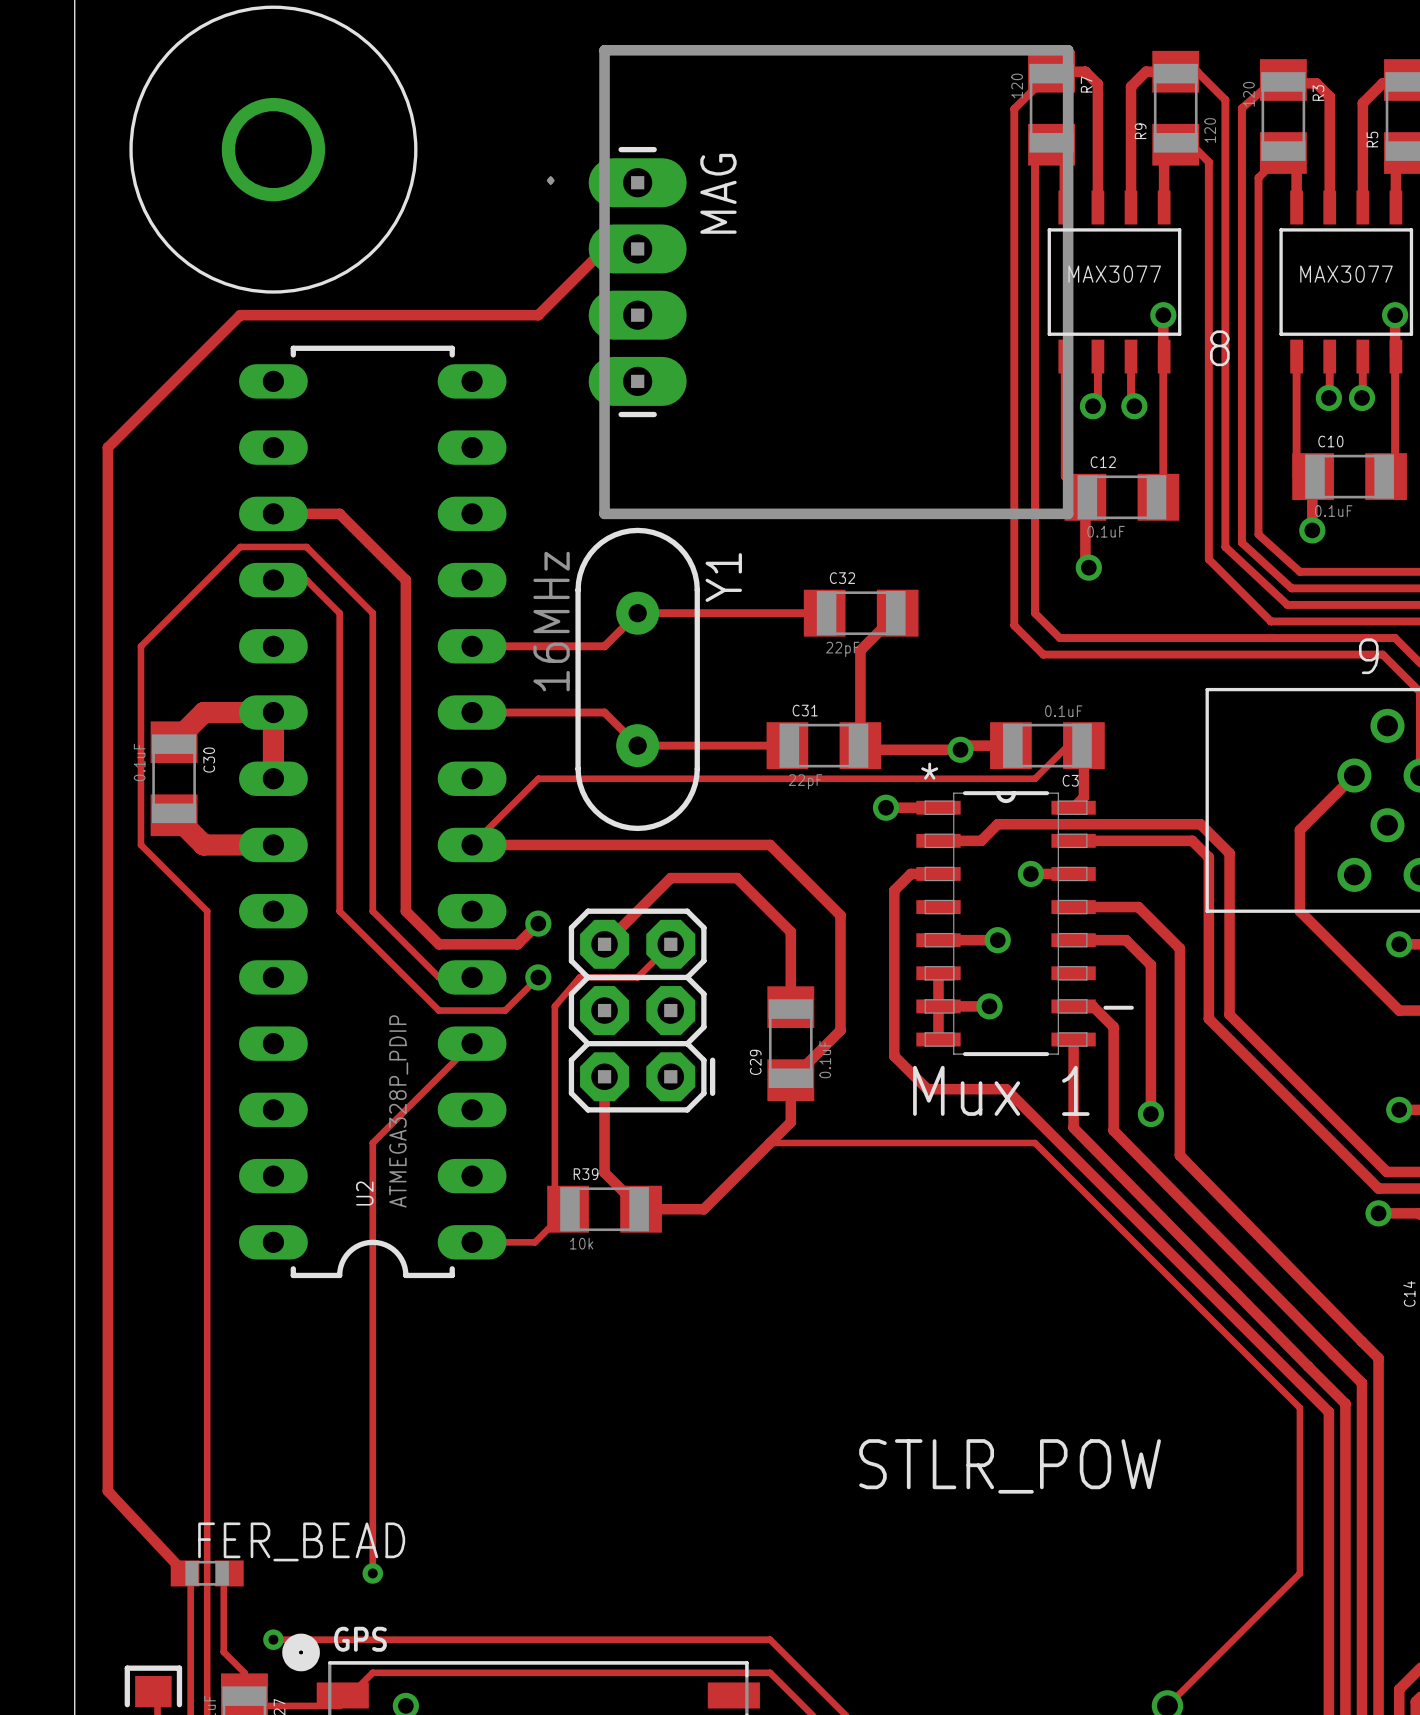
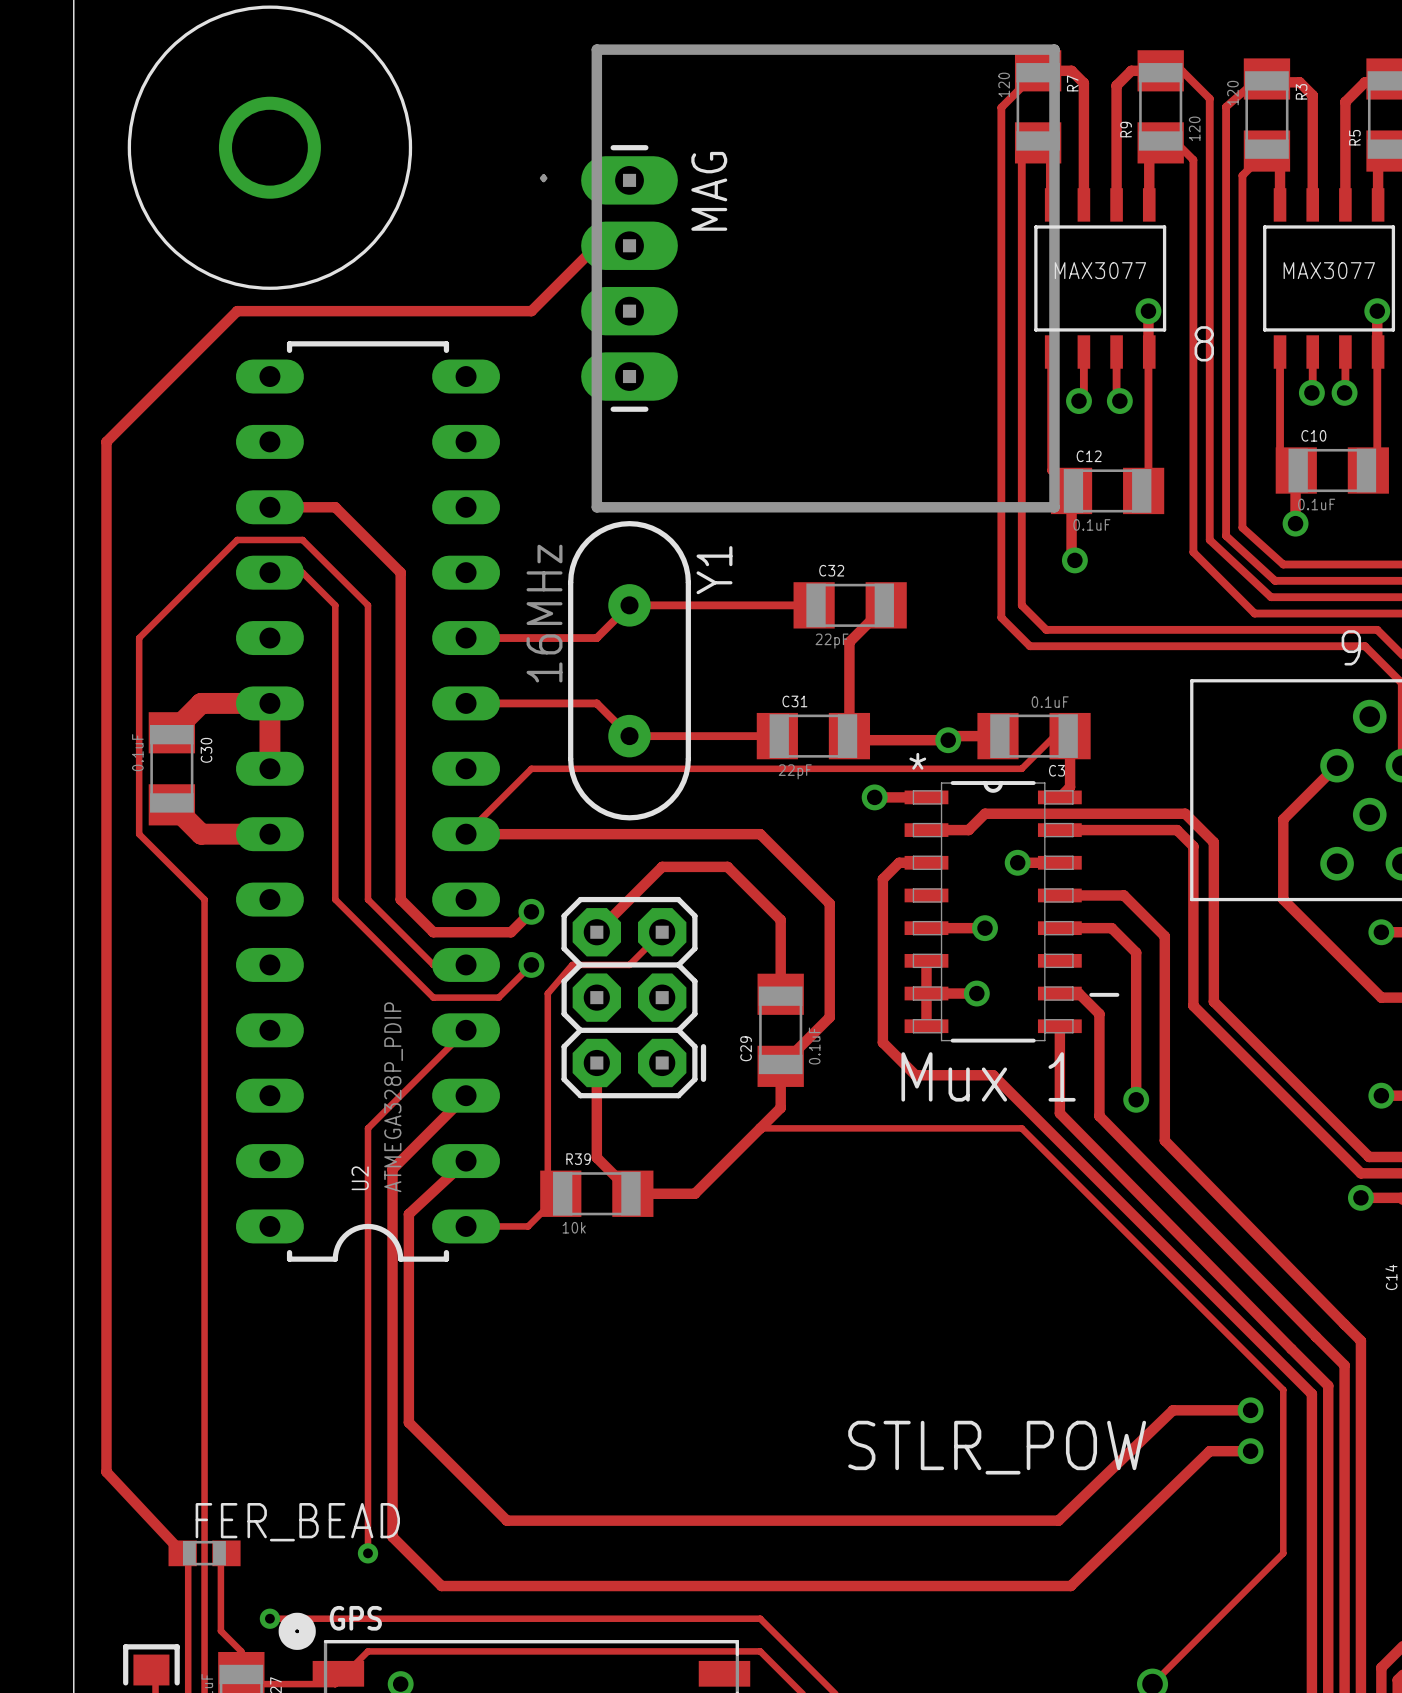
track: none -> (466, 1095) (392, 1169) (392, 1536) (441, 1586) (1070, 1586) (1209, 1451) (1250, 1451)
track: none -> (466, 1161) (408, 1214) (408, 1422) (506, 1520) (1058, 1520) (1172, 1410) (1250, 1410)
via: none -> (1250, 1410)
via: none -> (1250, 1451)

